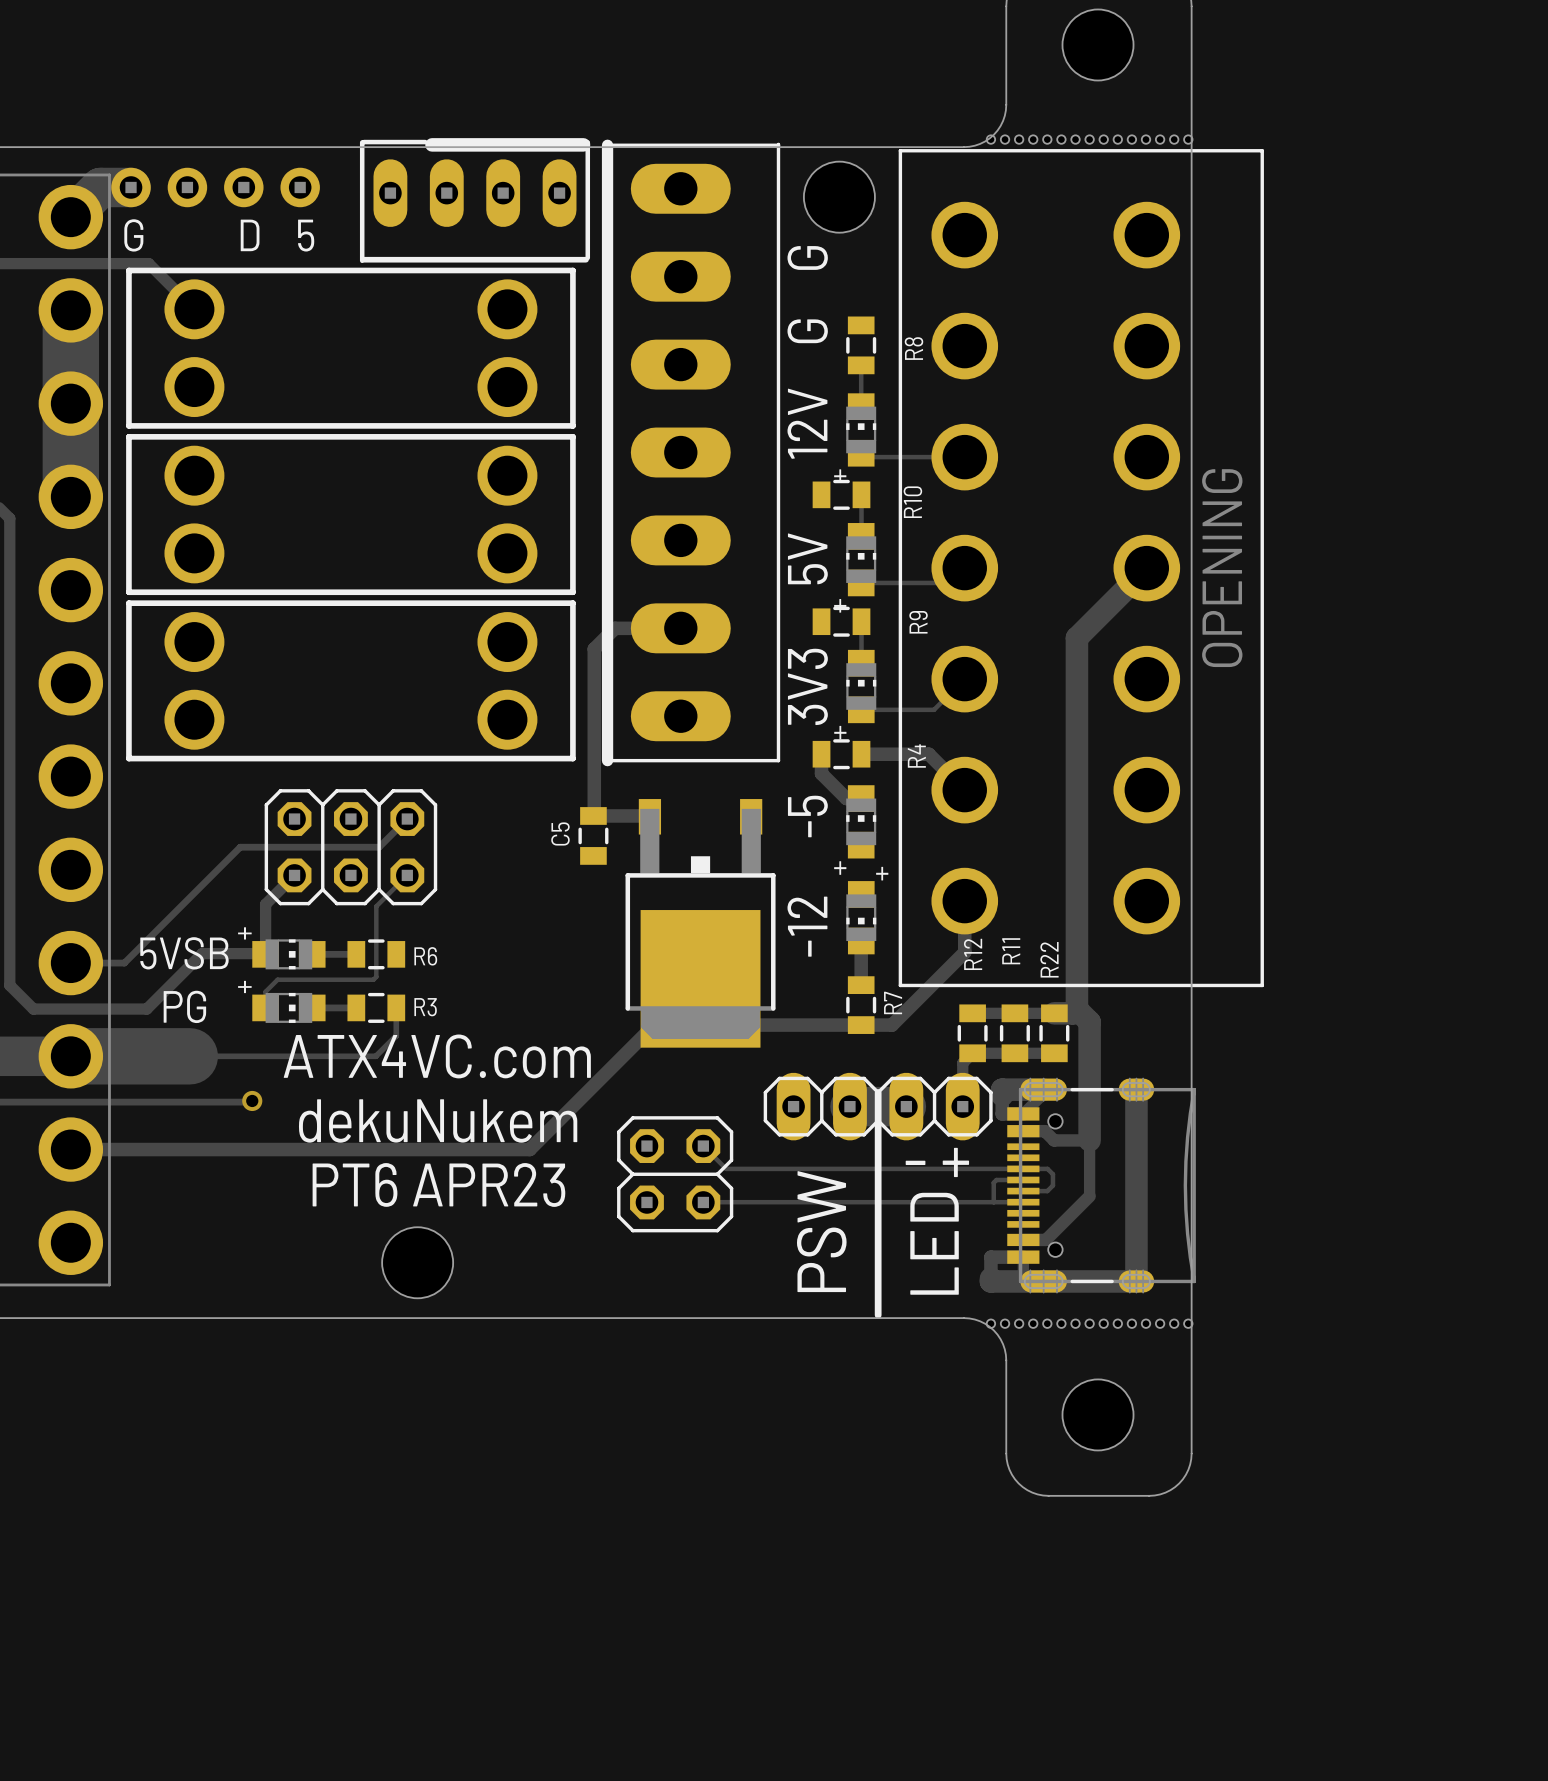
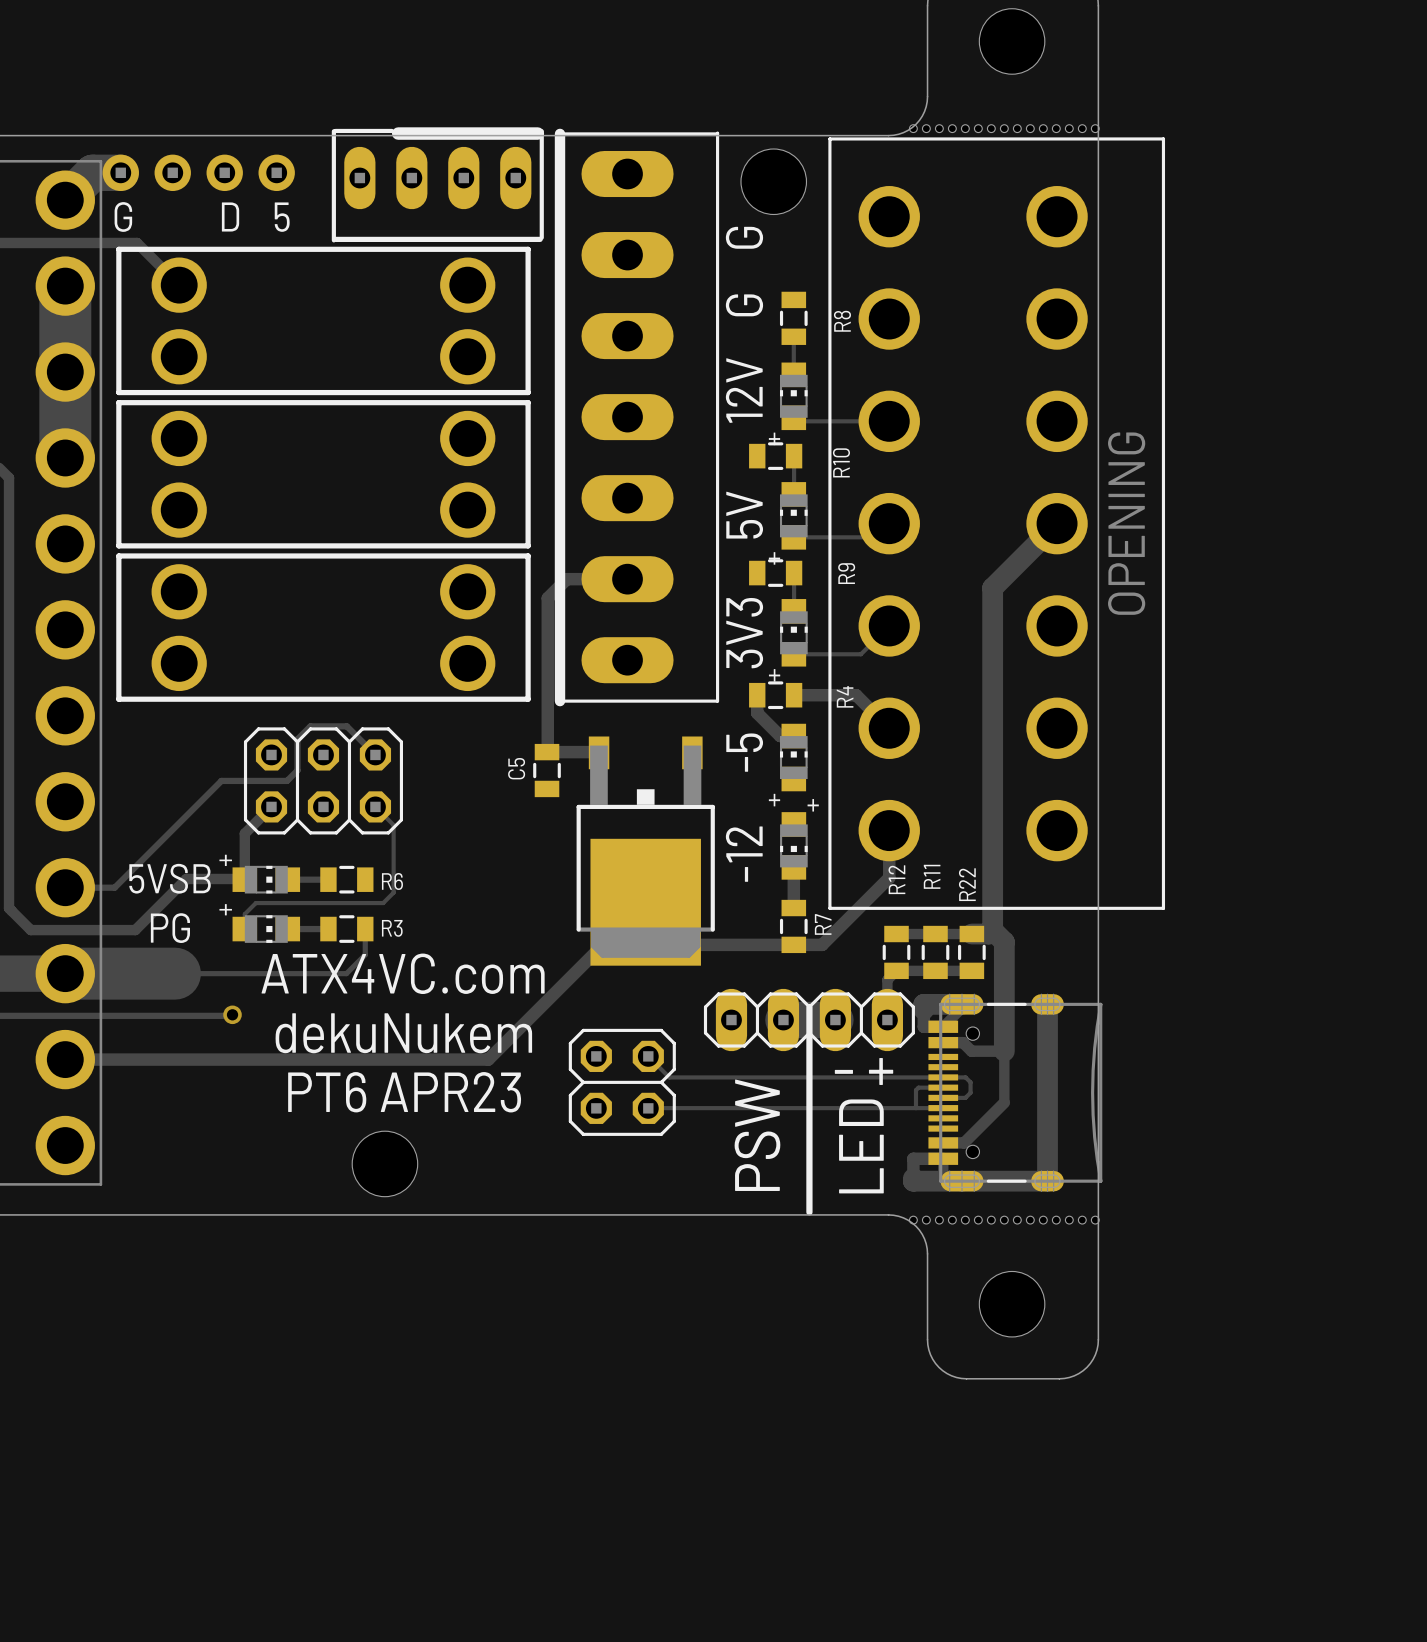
track: (407, 819) (379, 847) (311, 847) -> (375, 754) (346, 726) (310, 726) (297, 739) (297, 770) (287, 780)
track: (407, 875) (376, 906) (376, 976) (373, 979) -> (375, 806) (393, 825) (393, 892) (383, 903) (344, 903)

